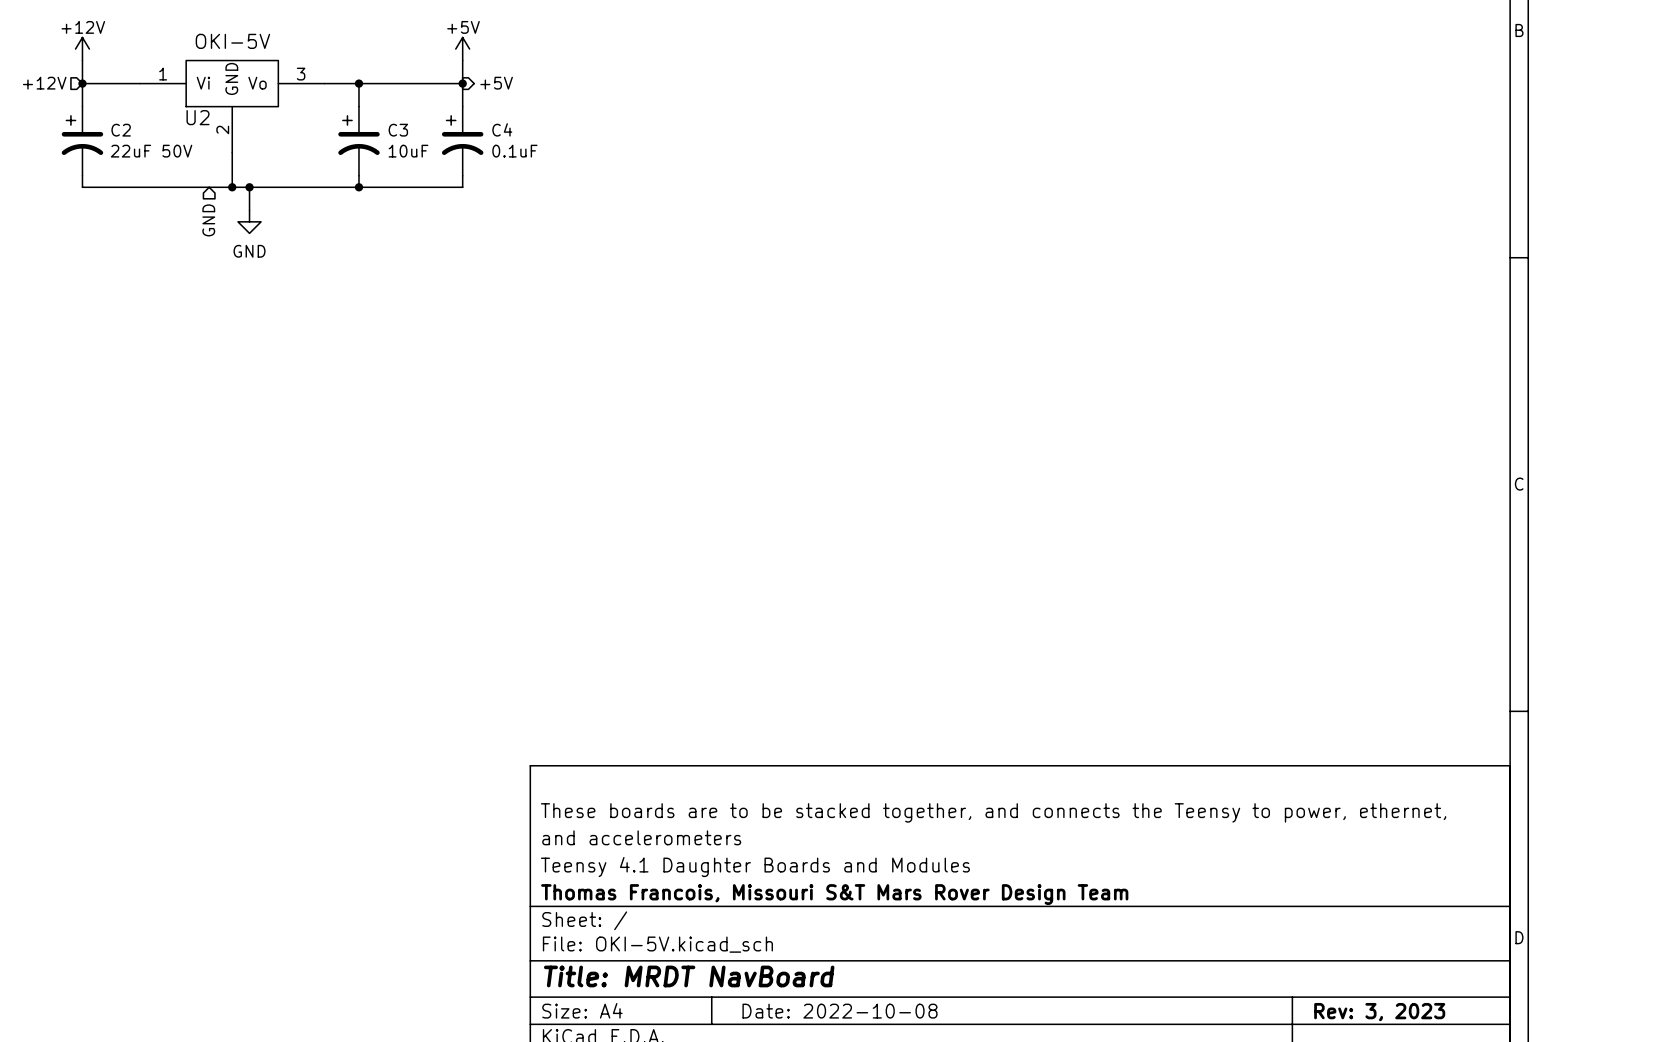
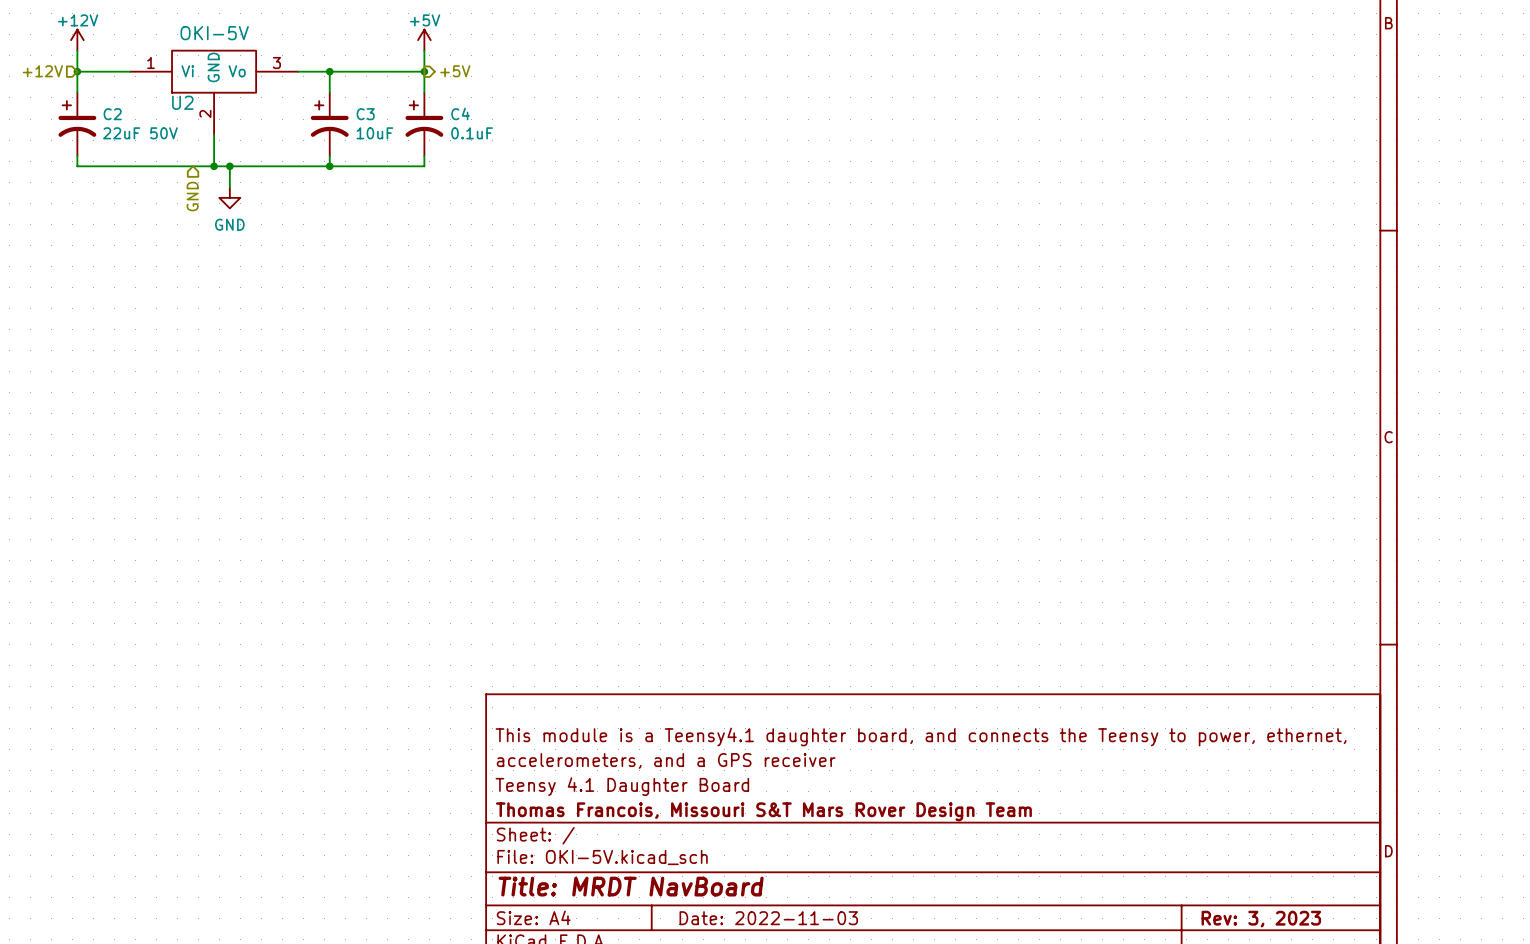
title block: These boards are to be stacked together, and connects the Teensy to power, ethernet, (993, 812) -> This module is a Teensy4.1 daughter board, and connects the Teensy to power, ethernet, (921, 736)
title block: and accelerometers (641, 837) -> accelerometers, and a GPS receiver (666, 760)
title block: Teensy 4.1 Daughter Boards and Modules (755, 867) -> Teensy 4.1 Daughter Board (622, 786)
title block: Date: 2022-10-08 (840, 1011) -> Date: 2022-11-03 (768, 918)

